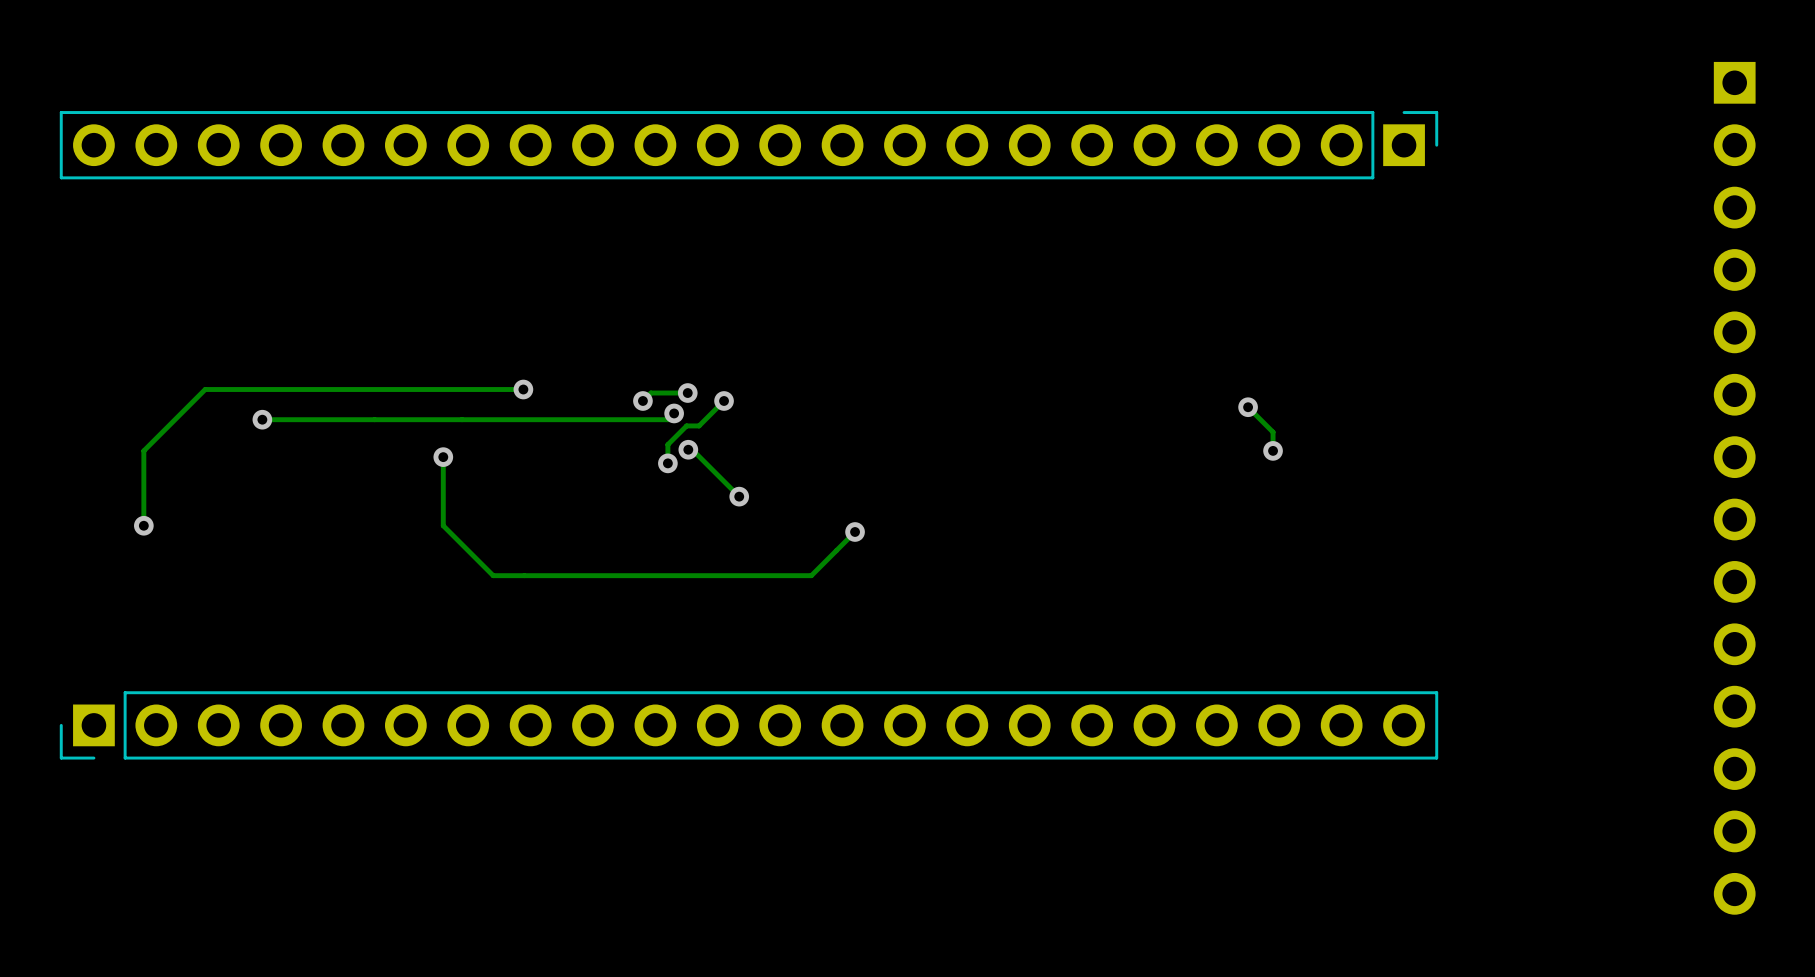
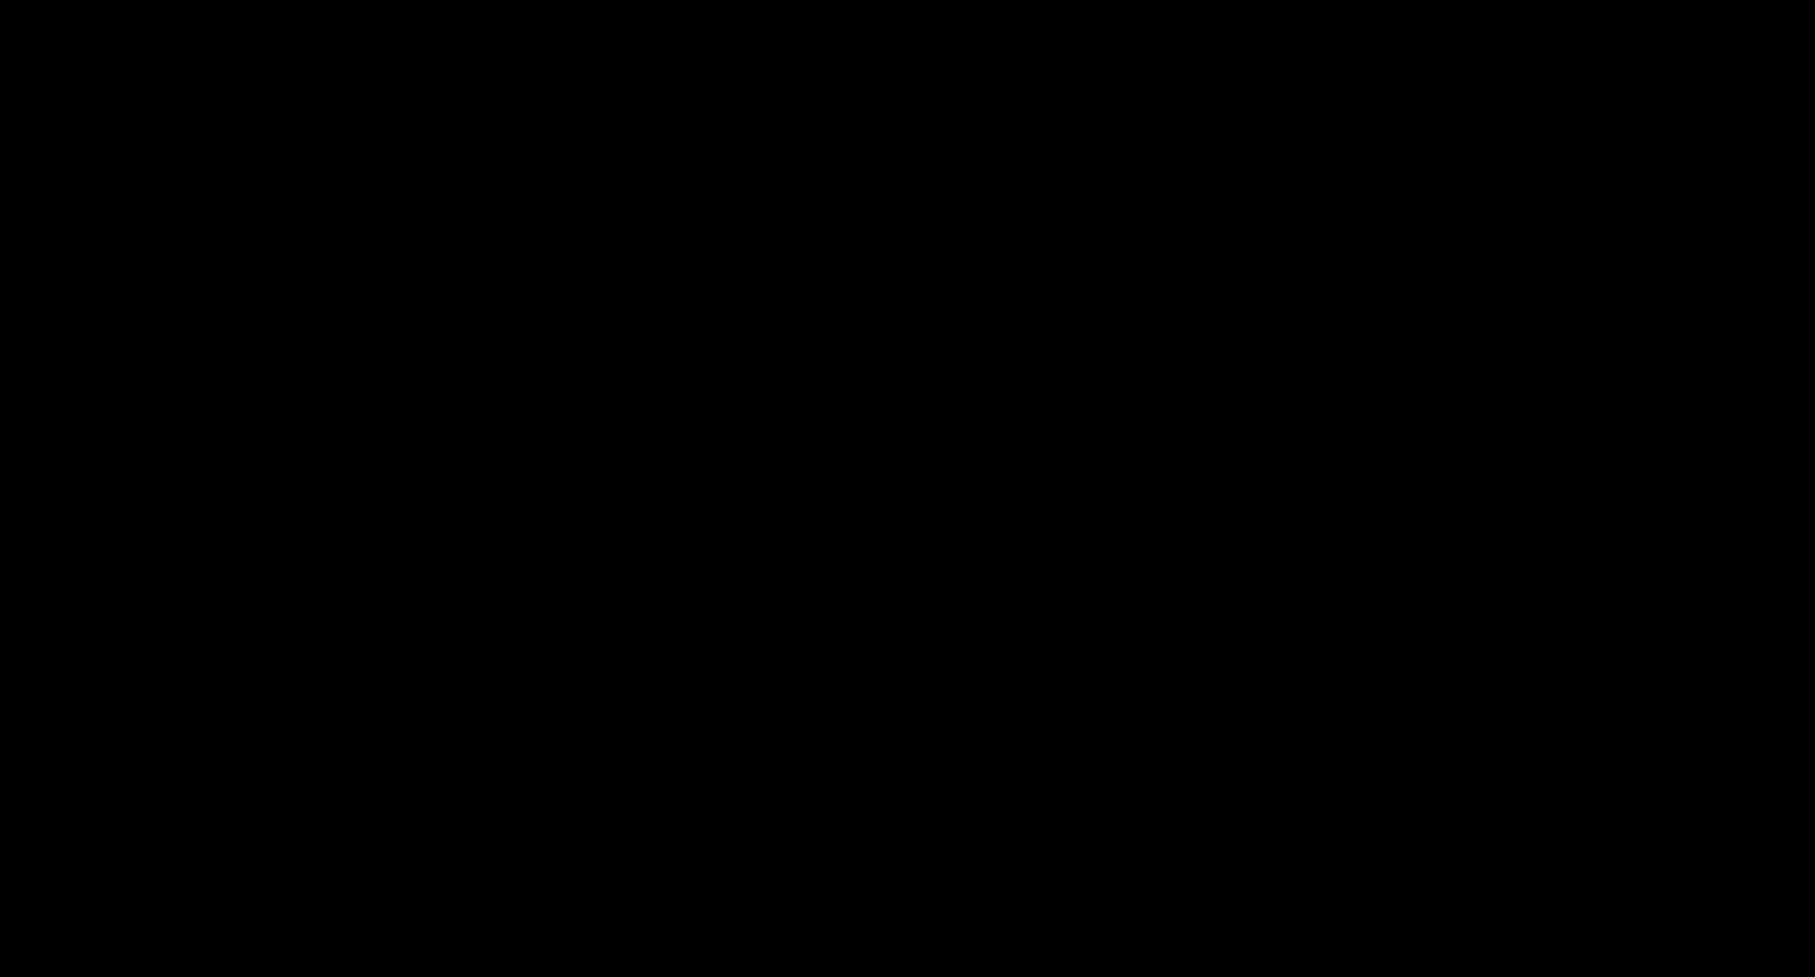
part: (748, 145) -> none
track: (523, 389) (205, 389) (143, 450) (143, 525) -> none
via: (523, 389) -> none
track: (687, 393) (650, 393) (642, 400) -> none
via: (687, 393) -> none
via: (642, 400) -> none
track: (724, 400) (699, 425) (686, 425) (667, 444) (667, 463) -> none
via: (724, 400) -> none
track: (1248, 407) (1273, 432) (1273, 450) -> none
via: (1248, 407) -> none
track: (674, 413) (667, 419) (262, 419) -> none
via: (674, 413) -> none
via: (262, 419) -> none
track: (688, 449) (692, 449) (739, 496) -> none
via: (688, 449) -> none
via: (1273, 450) -> none
track: (443, 457) (443, 525) (493, 575) (811, 575) (855, 531) -> none
via: (443, 457) -> none
via: (667, 463) -> none
part: (1734, 488) -> none
via: (739, 496) -> none
via: (143, 525) -> none
via: (855, 531) -> none
part: (748, 725) -> none

